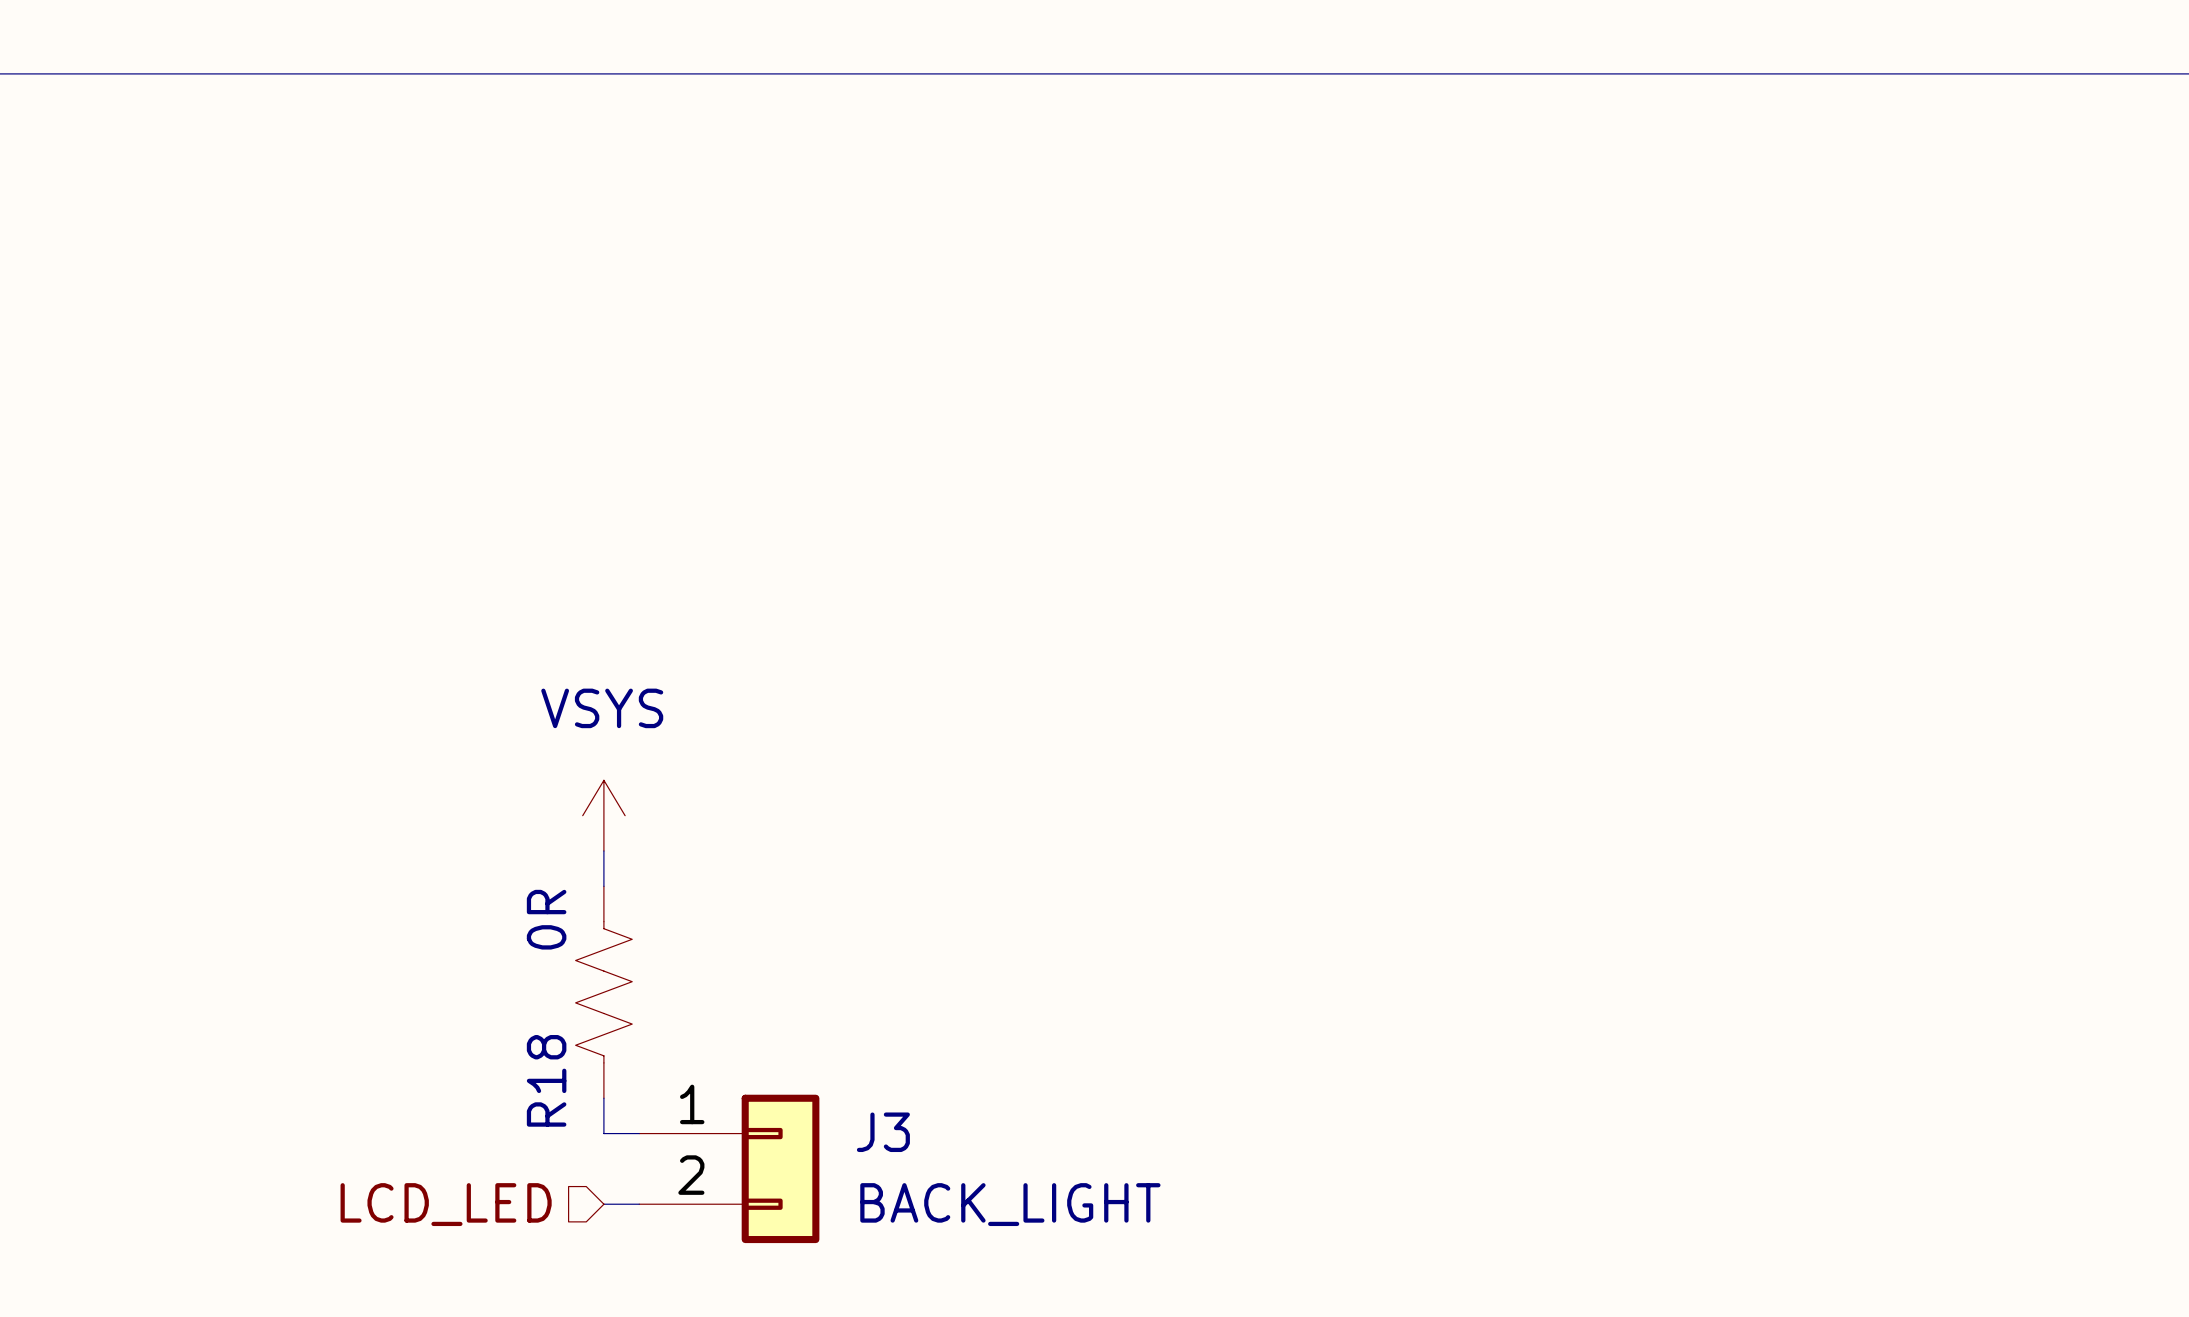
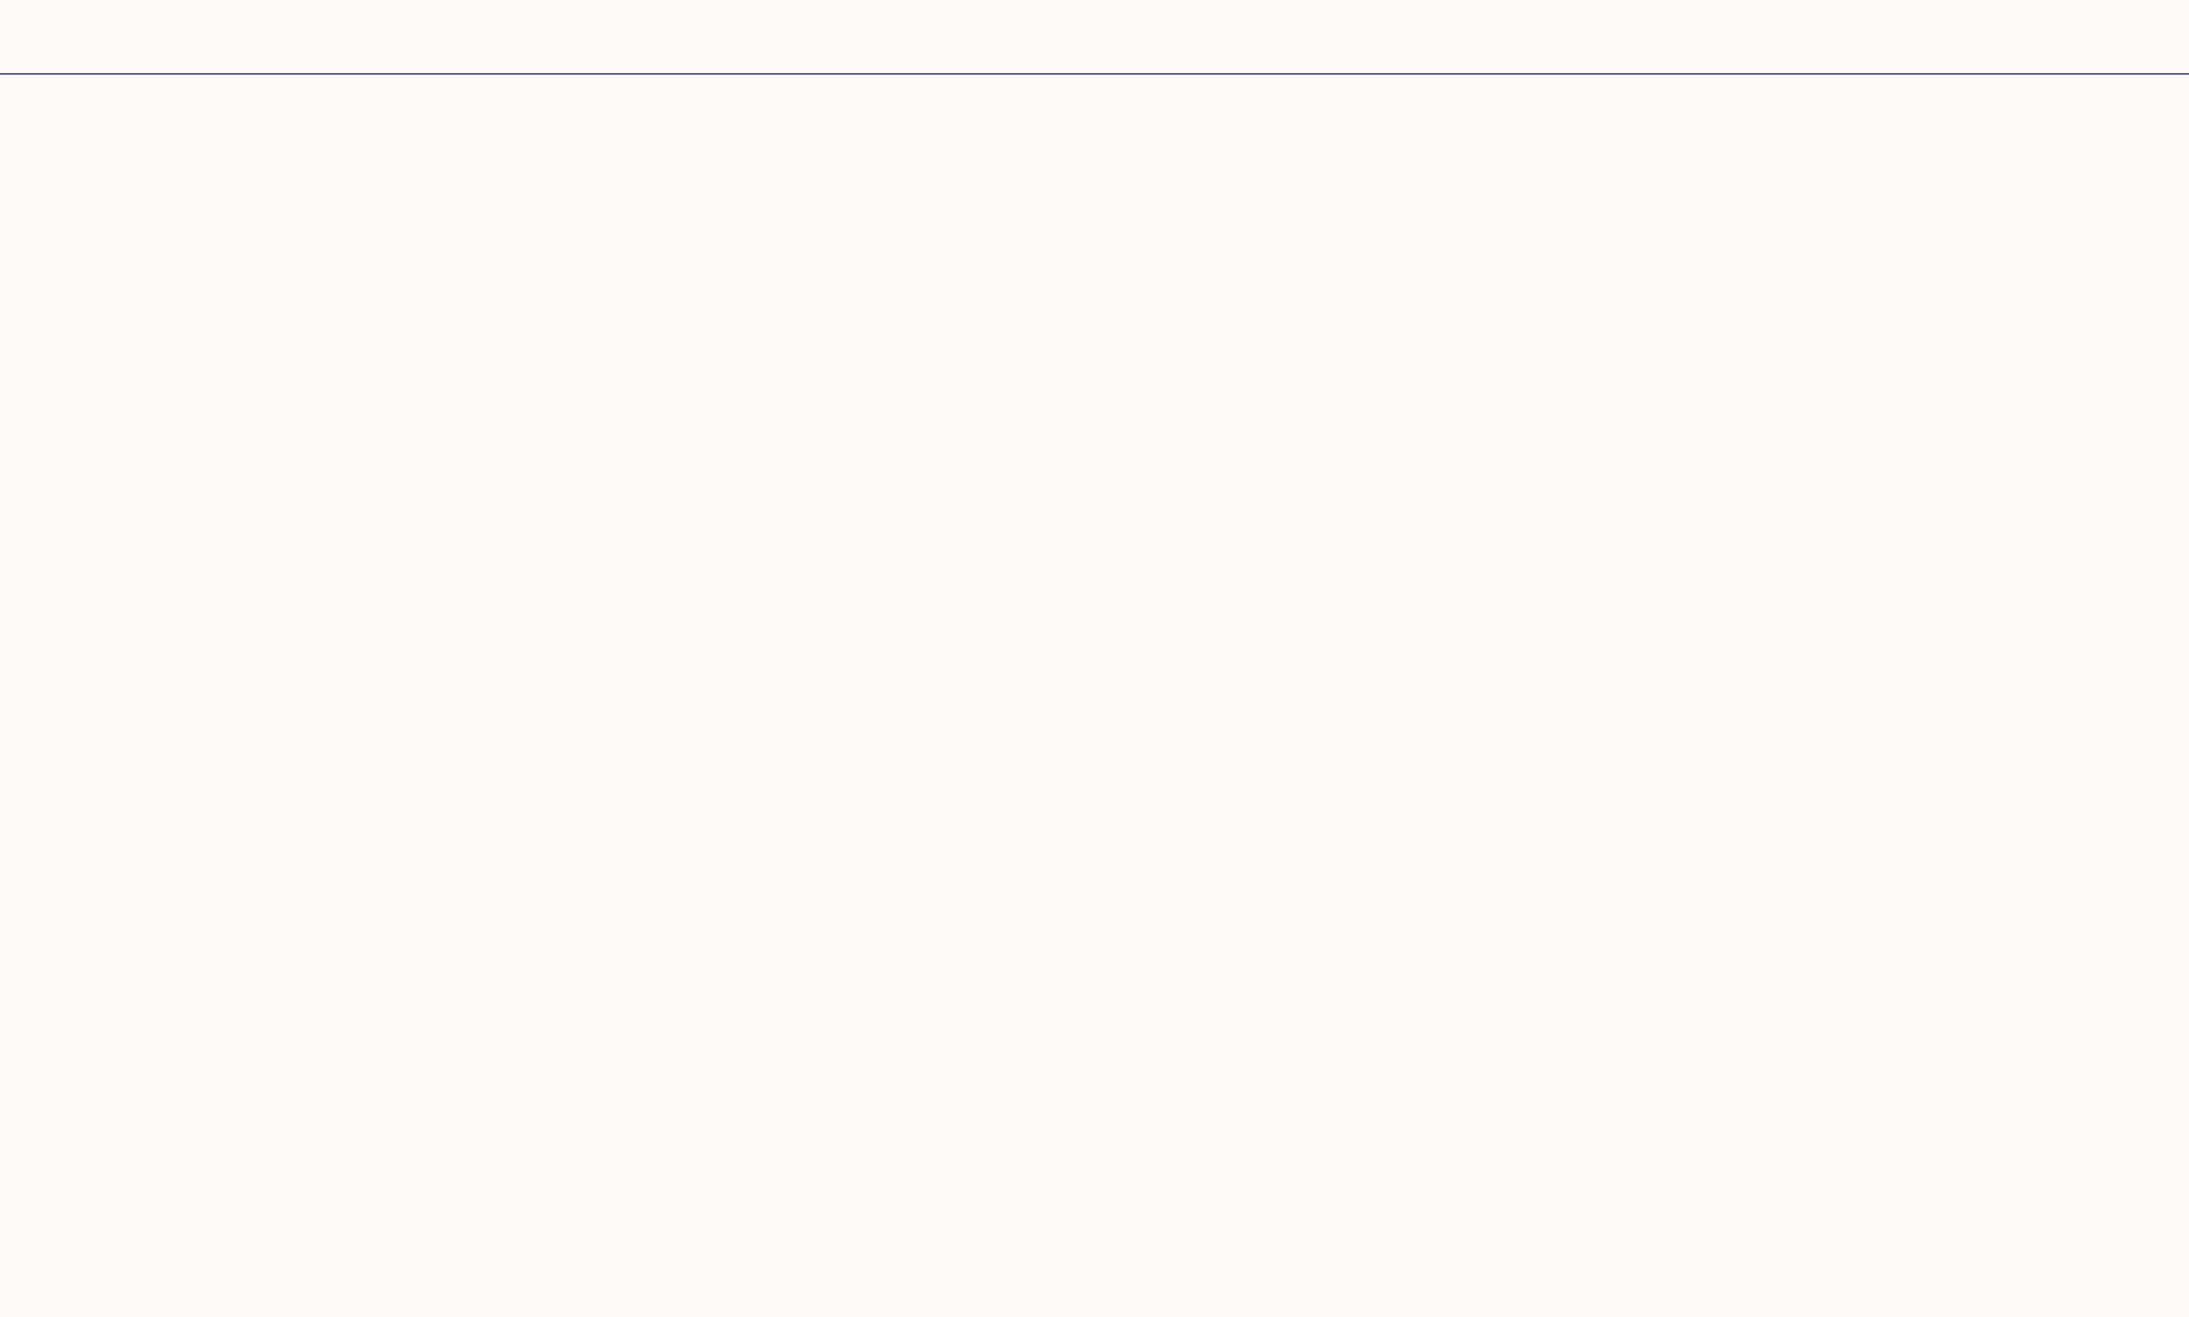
power symbol: VSYS (603, 815) -> none
wire: (603, 851) (603, 886) -> none
R18: 0R (603, 992) -> none
wire: (603, 1098) (603, 1133) (639, 1133) -> none
J3: BACK_LIGHT (729, 1168) -> none
hierarchical label: LCD_LED (446, 1204) -> none
wire: (603, 1204) (639, 1204) -> none

